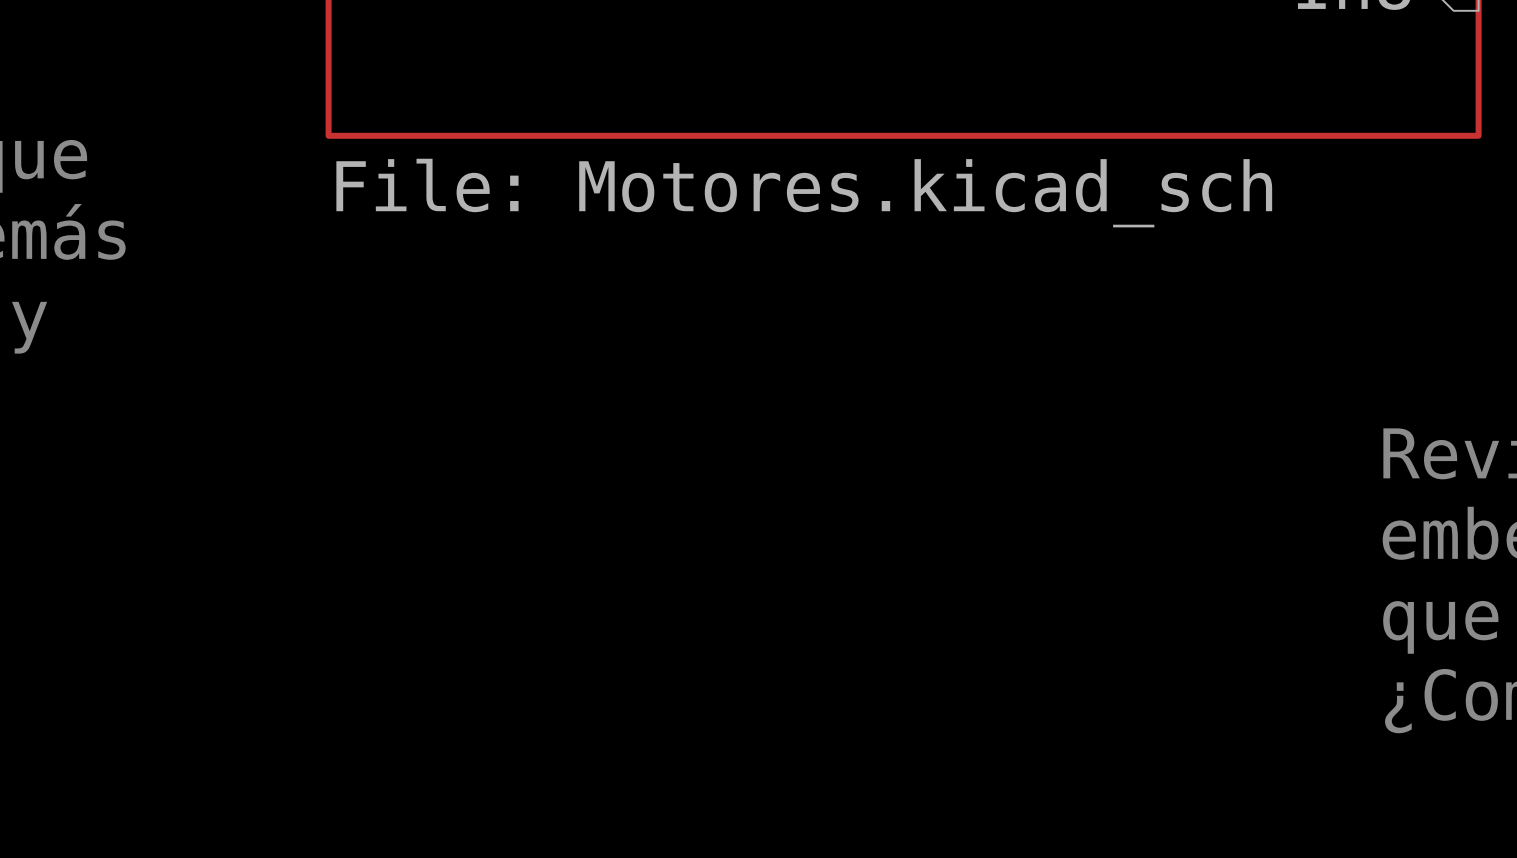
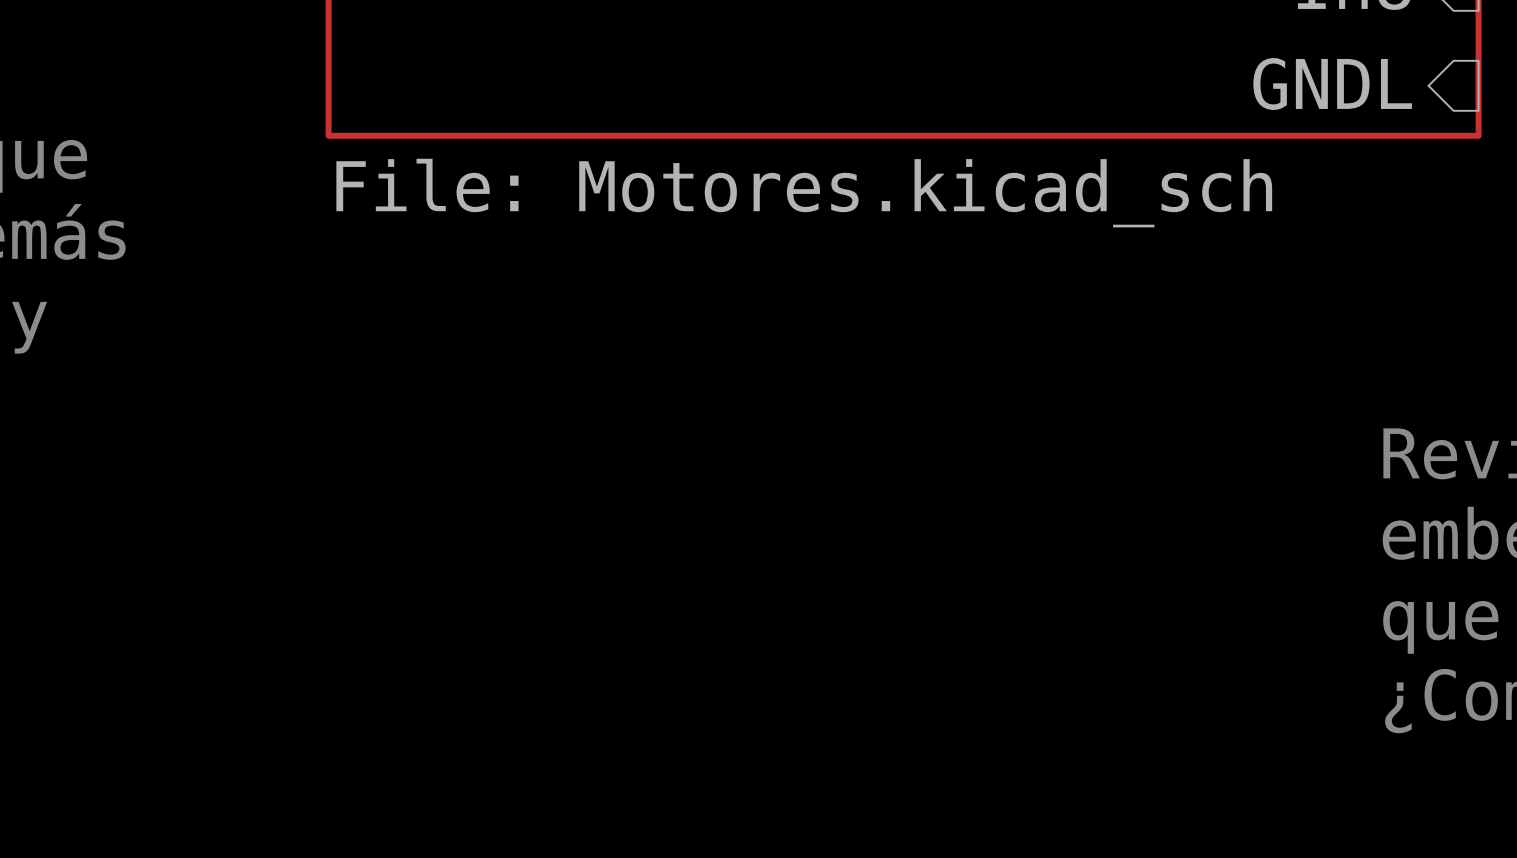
sheet pin: none -> GNDL (1332, 83)

